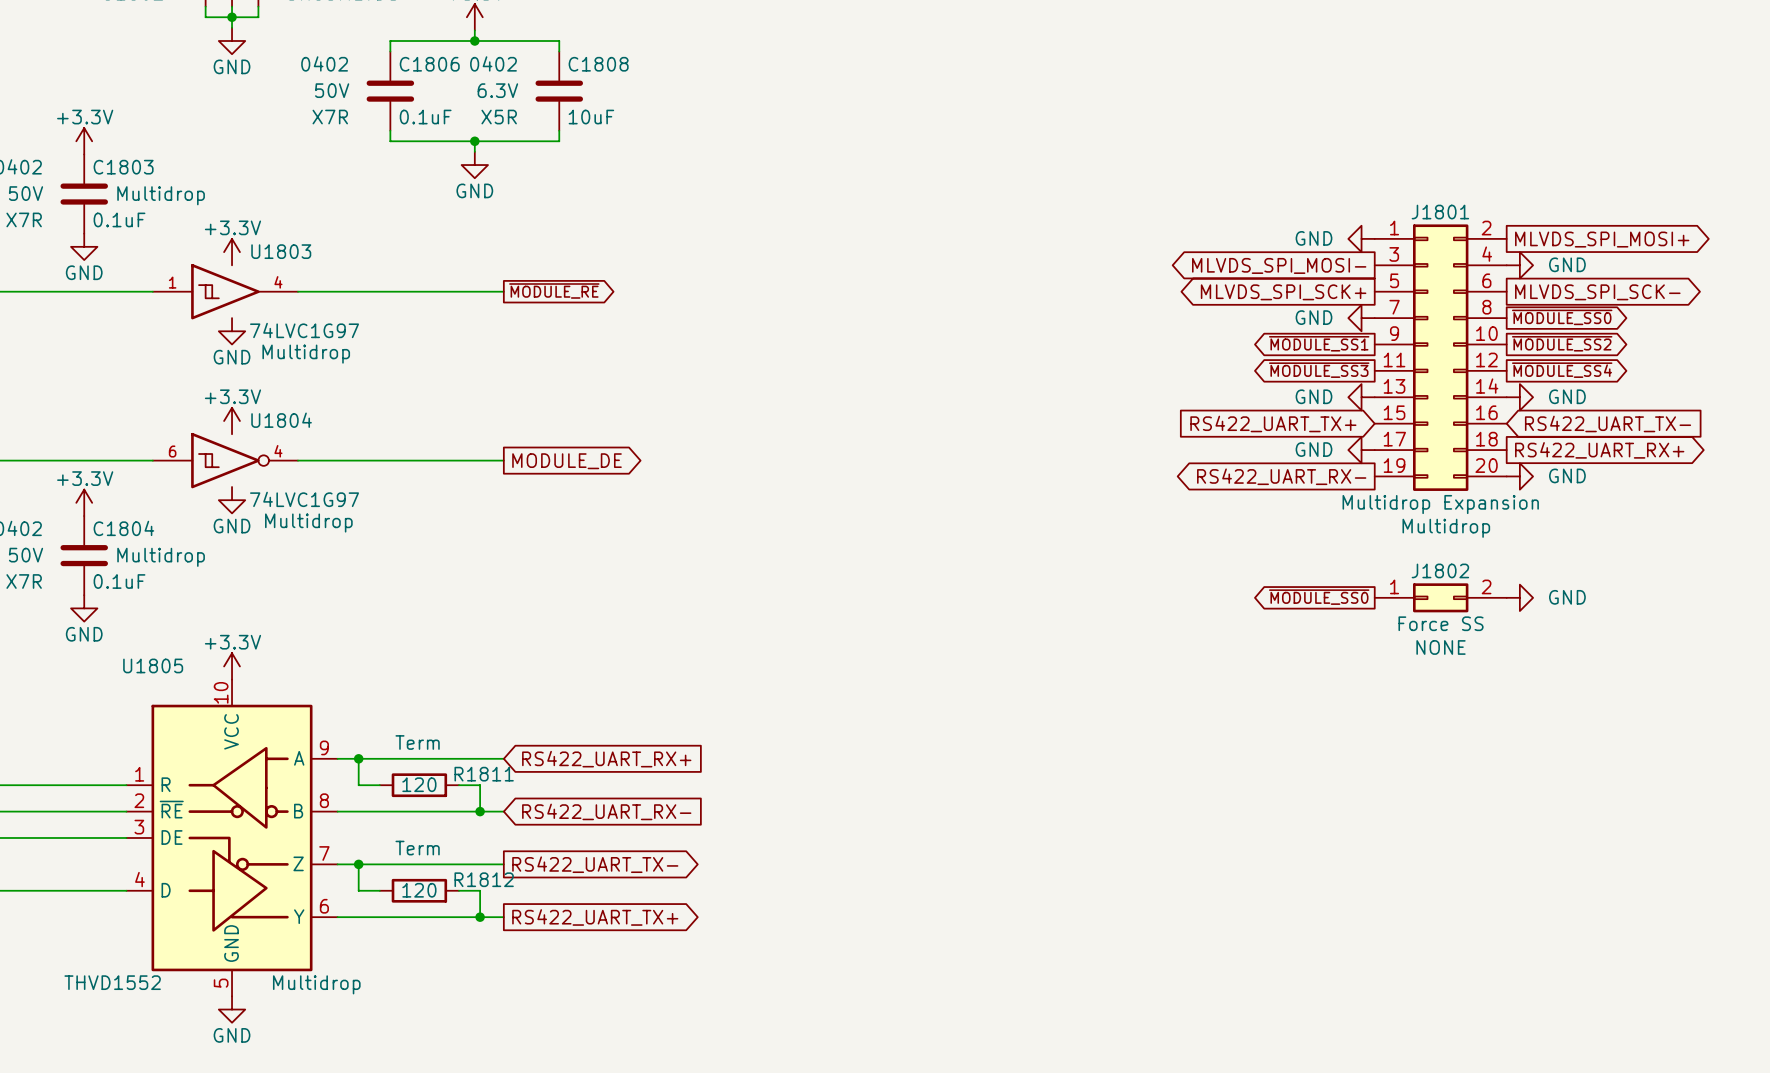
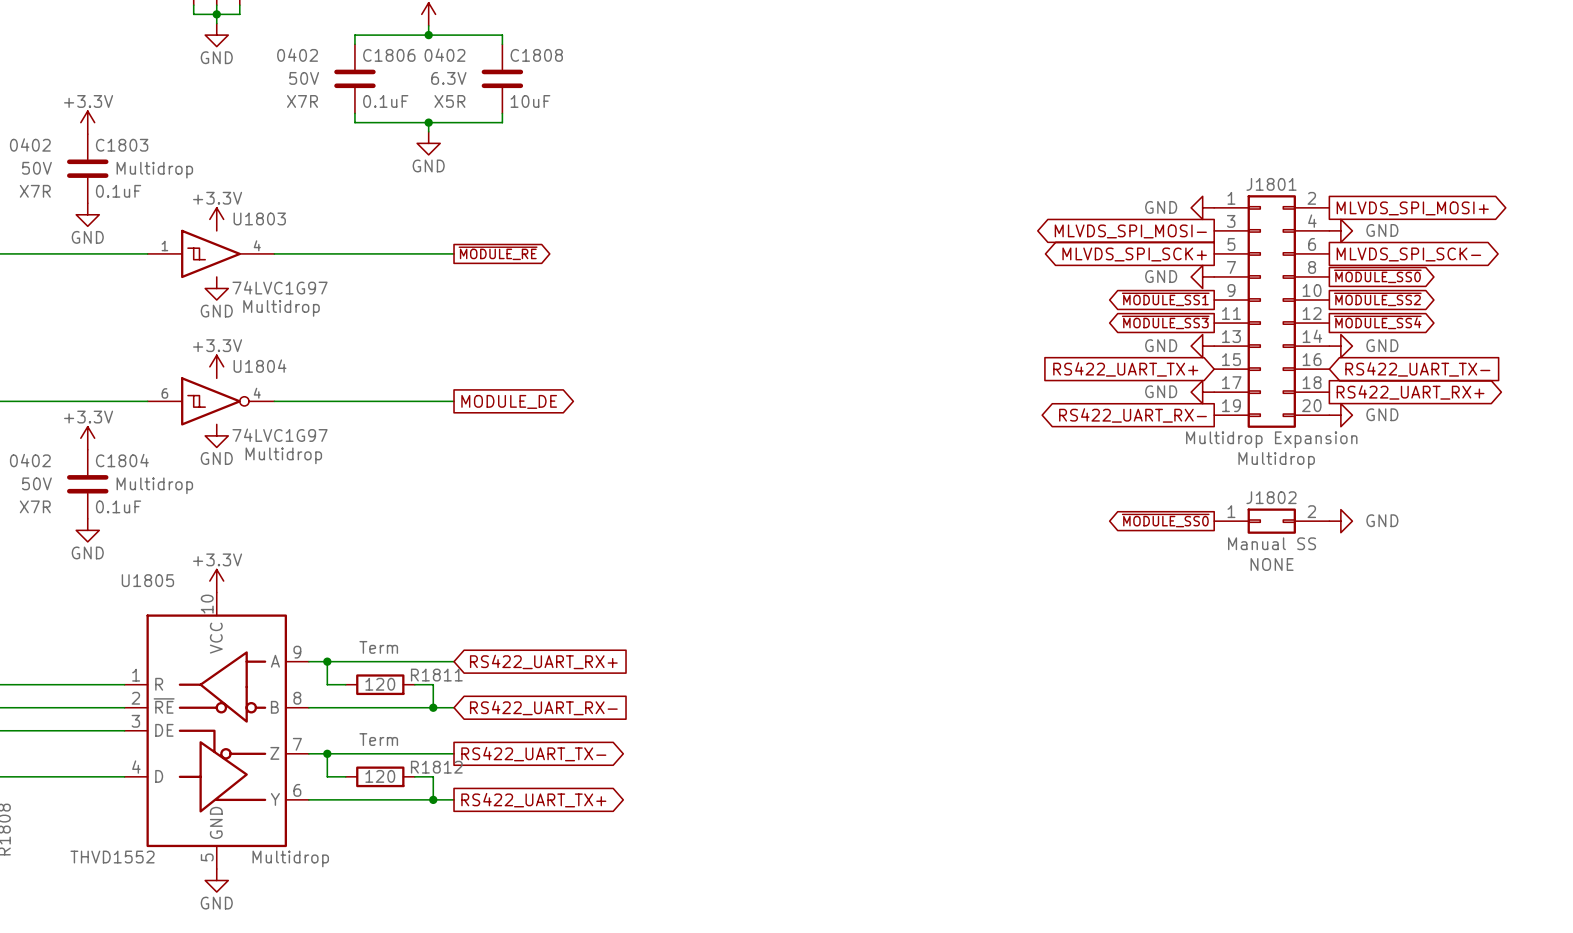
J1802 value: Force SS (1441, 623) -> Manual SS (1272, 543)

